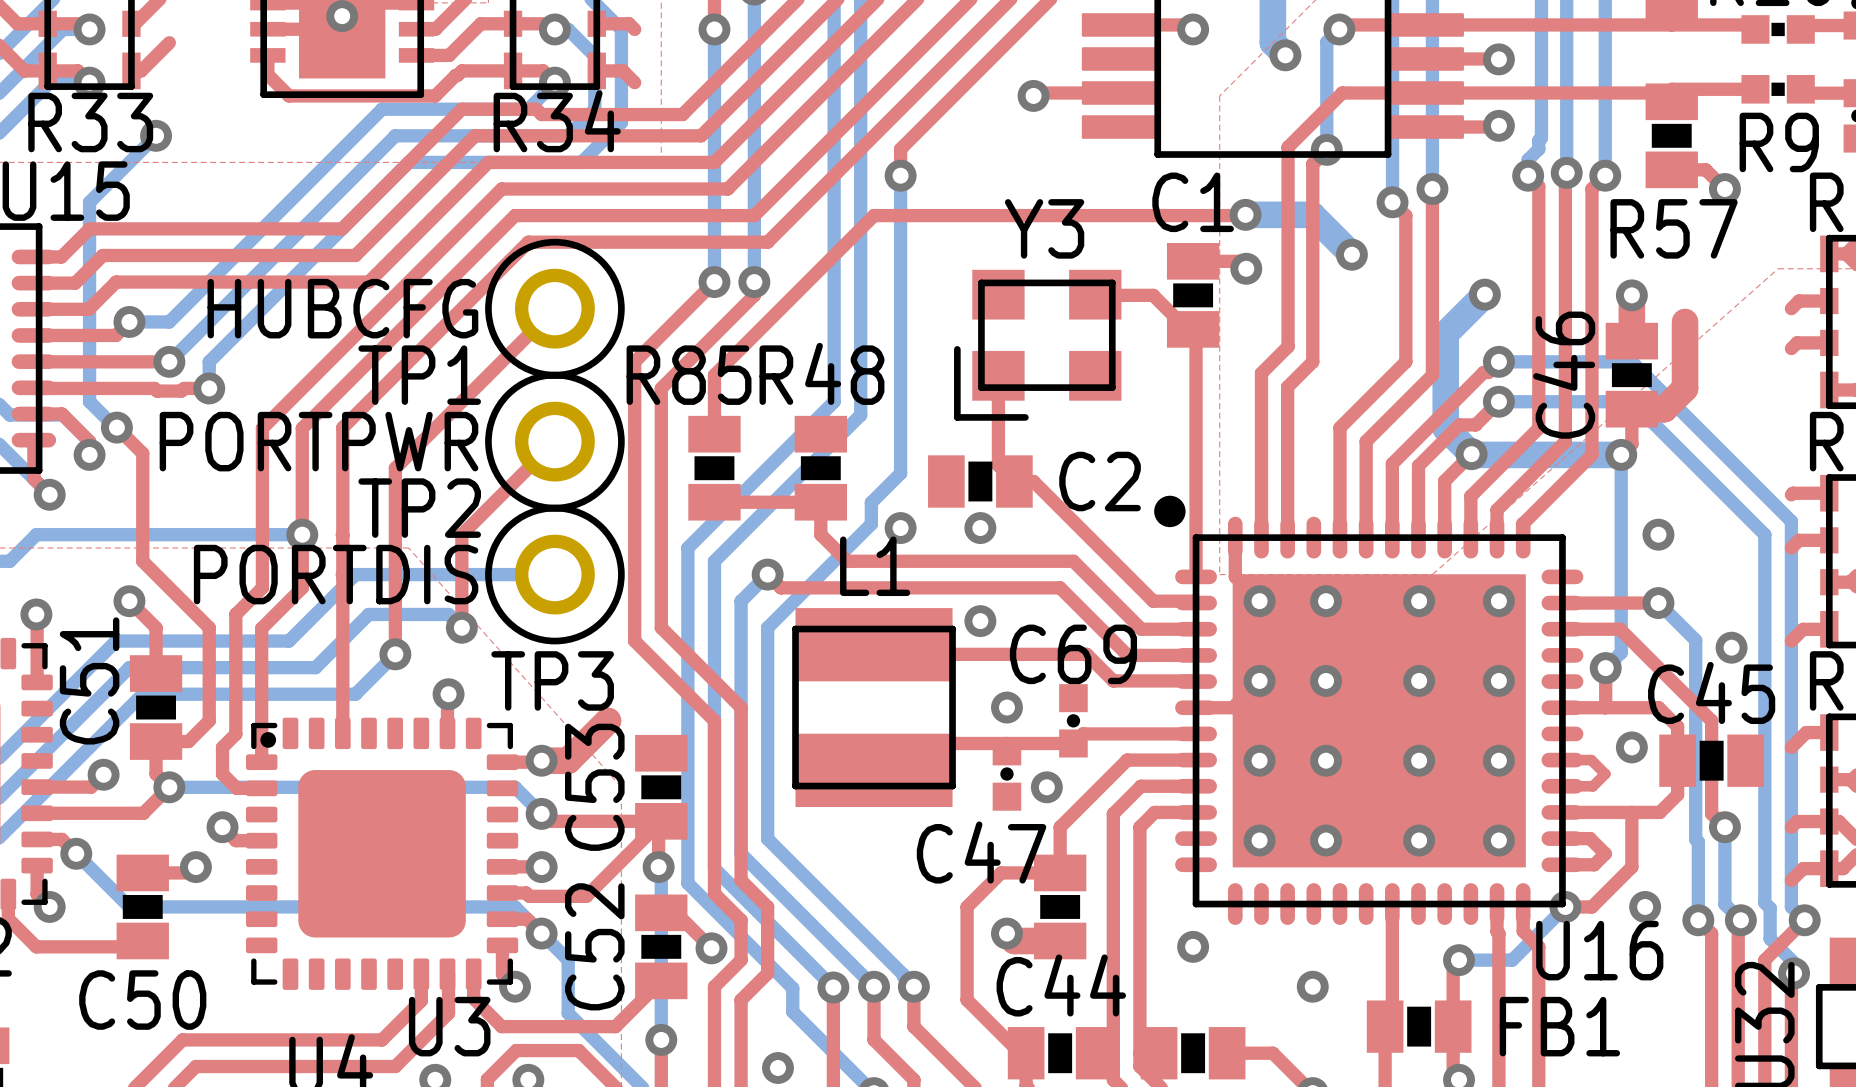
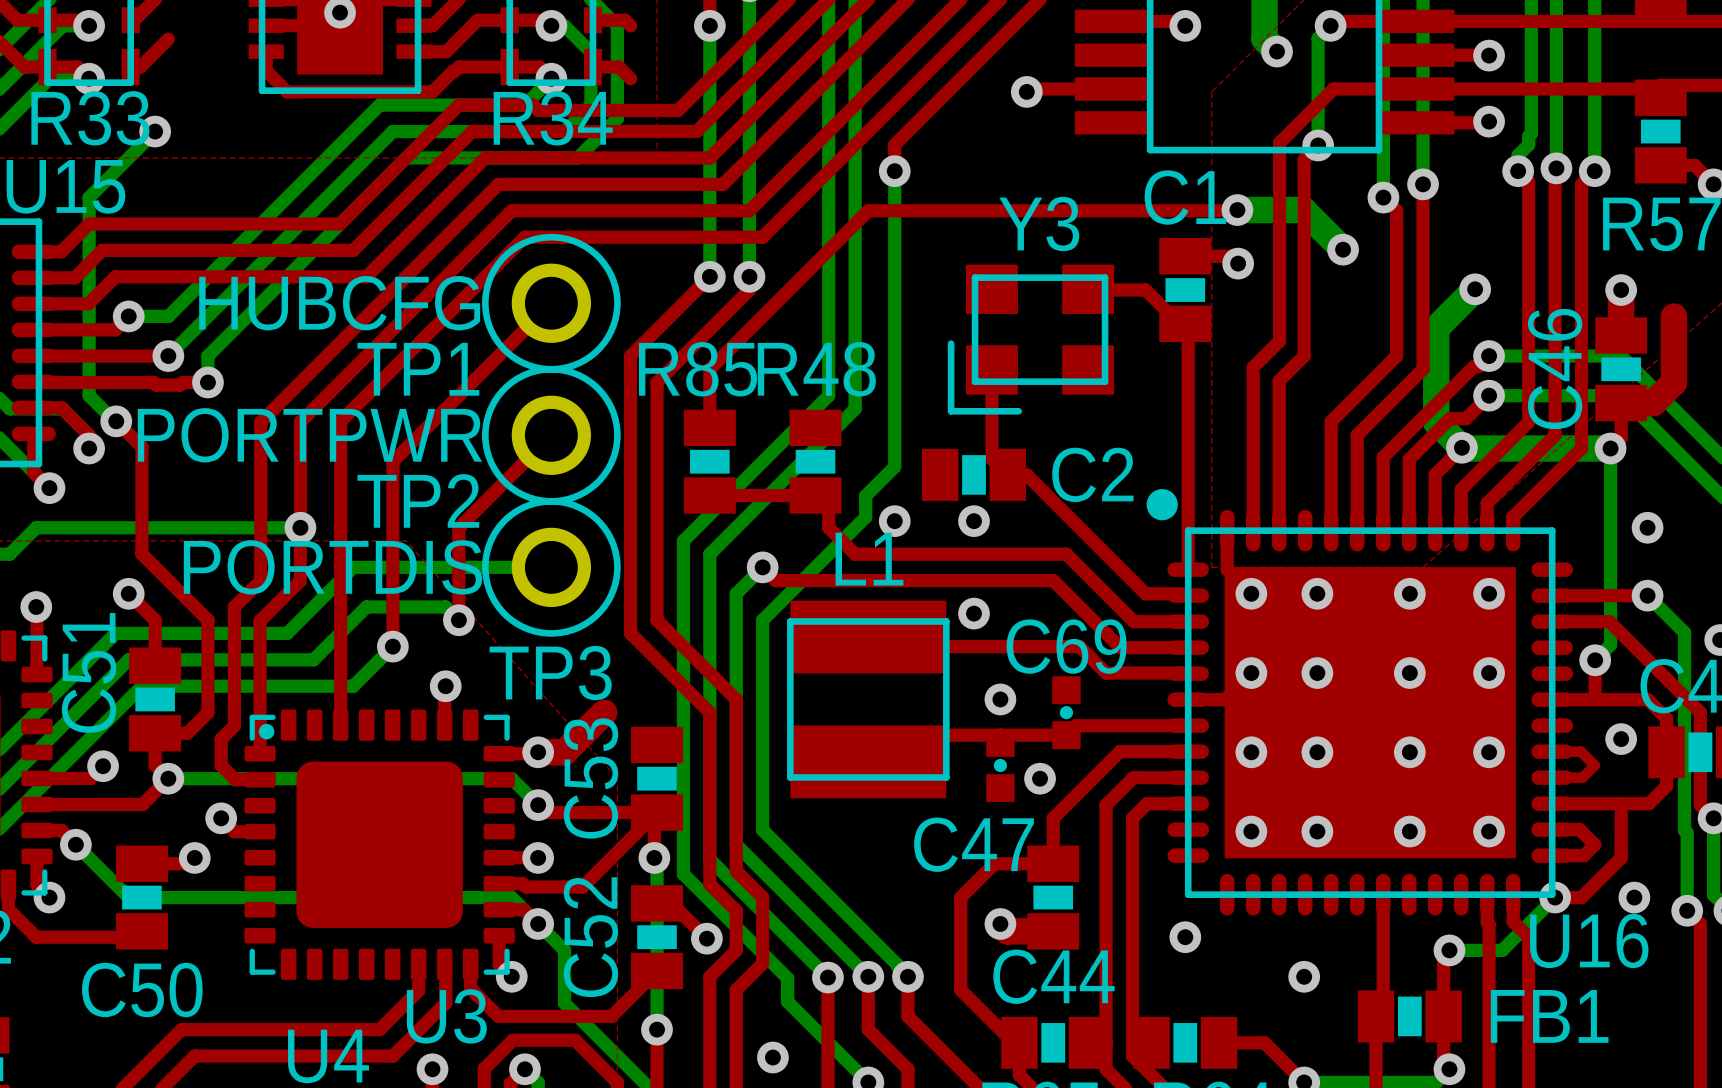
R85 name position: R85 (689, 375) -> R85 (698, 369)
top track: (820, 502) (820, 534) (847, 561) (860, 561) -> (815, 495) (828, 495) (828, 527) (855, 554)

